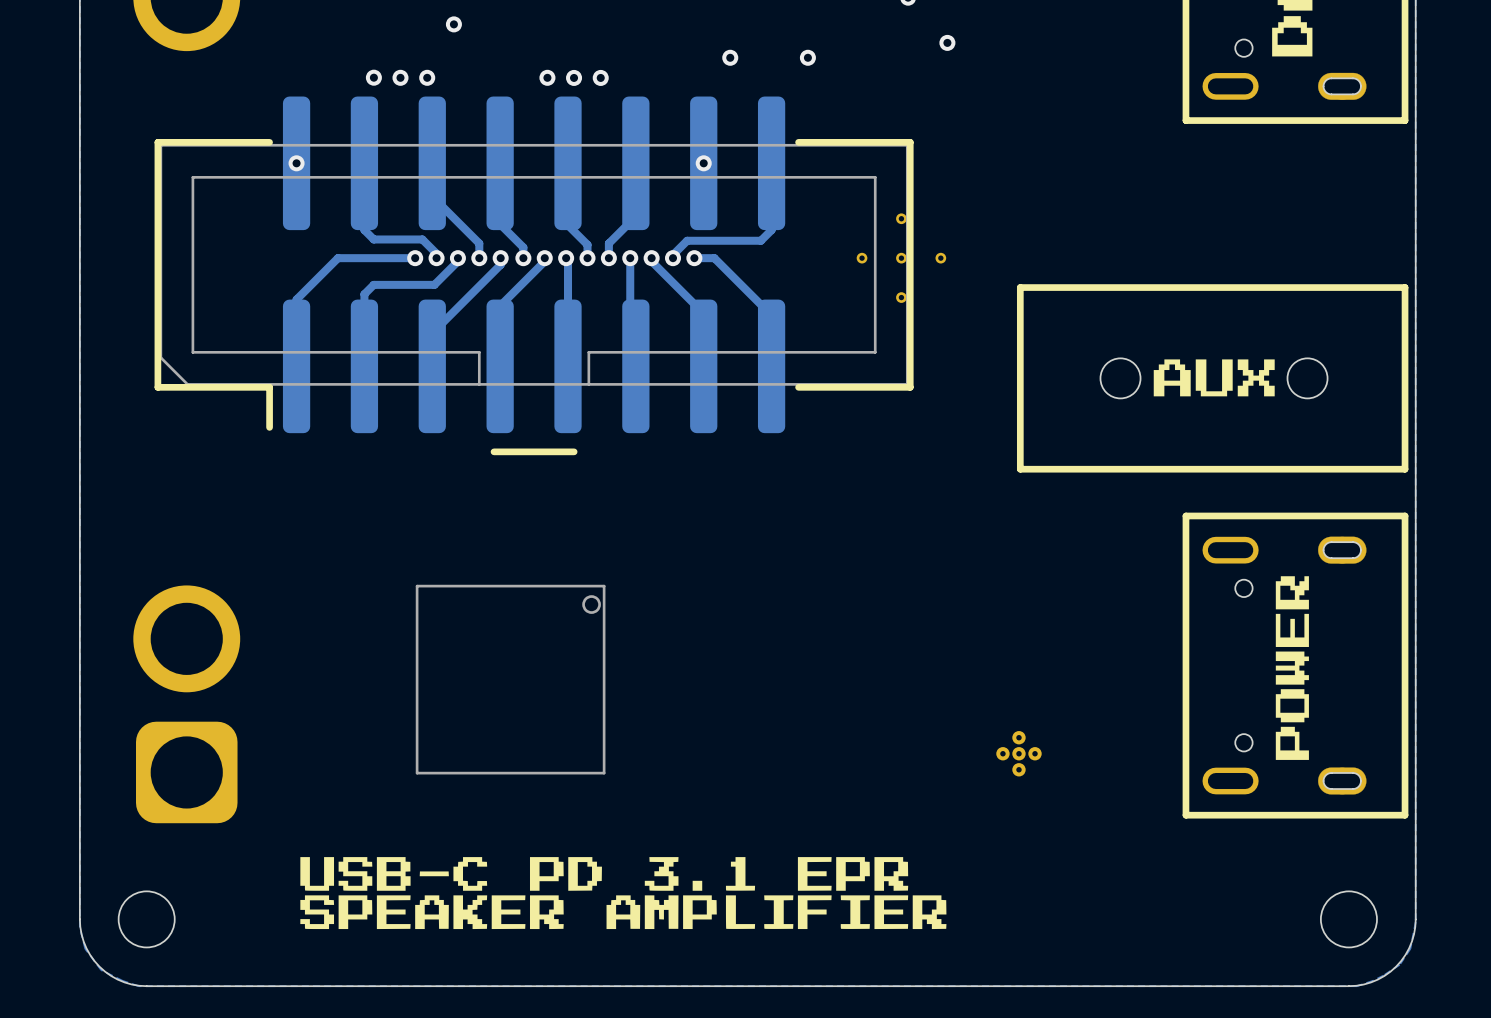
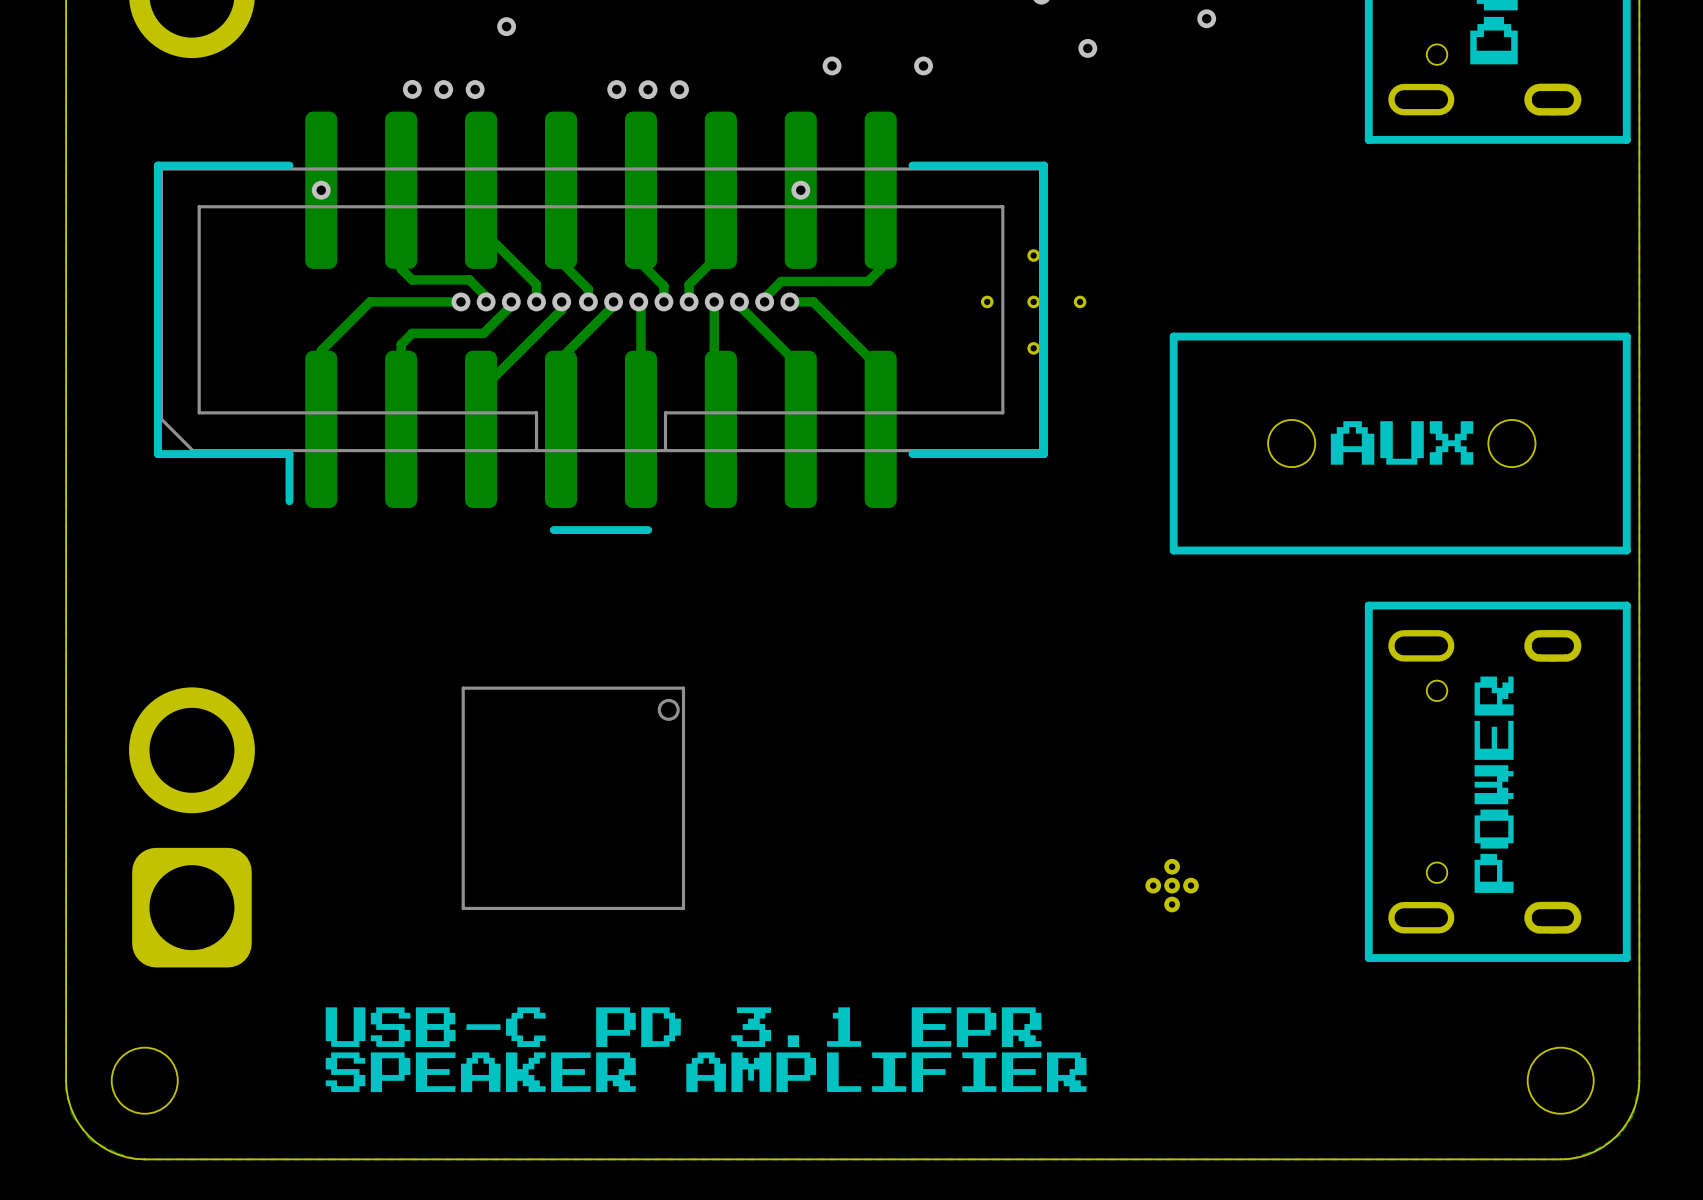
via: none -> (1206, 18)

